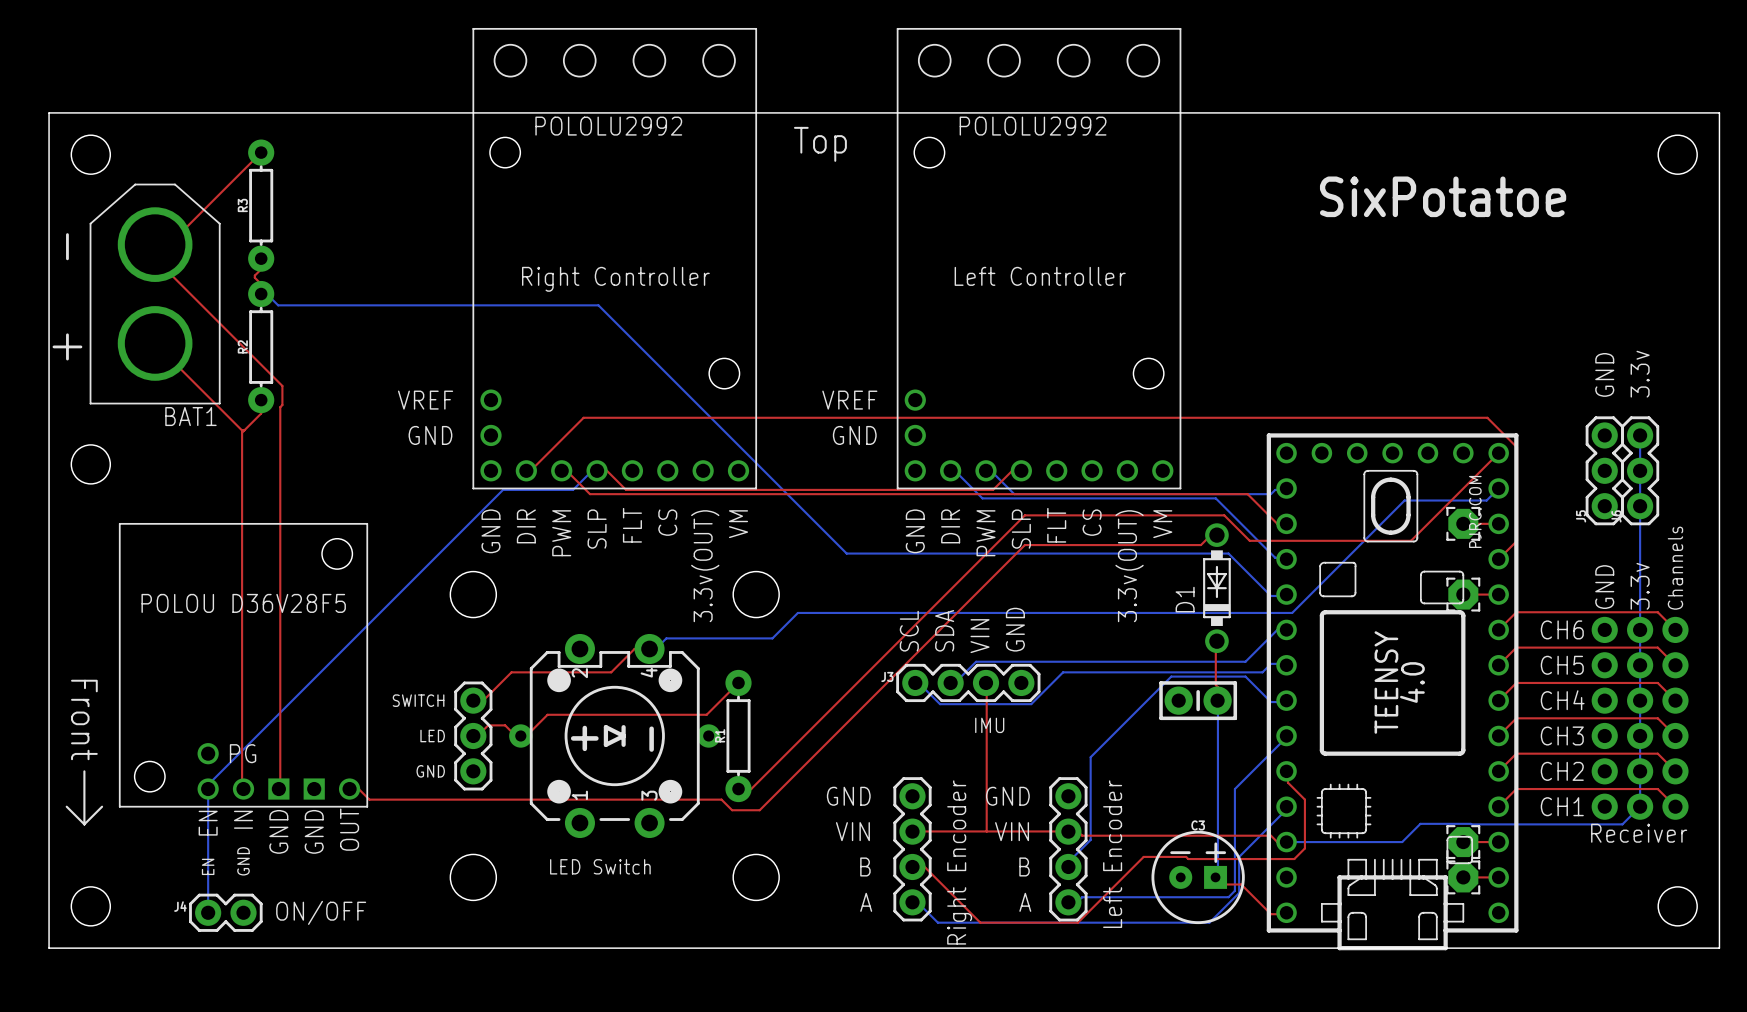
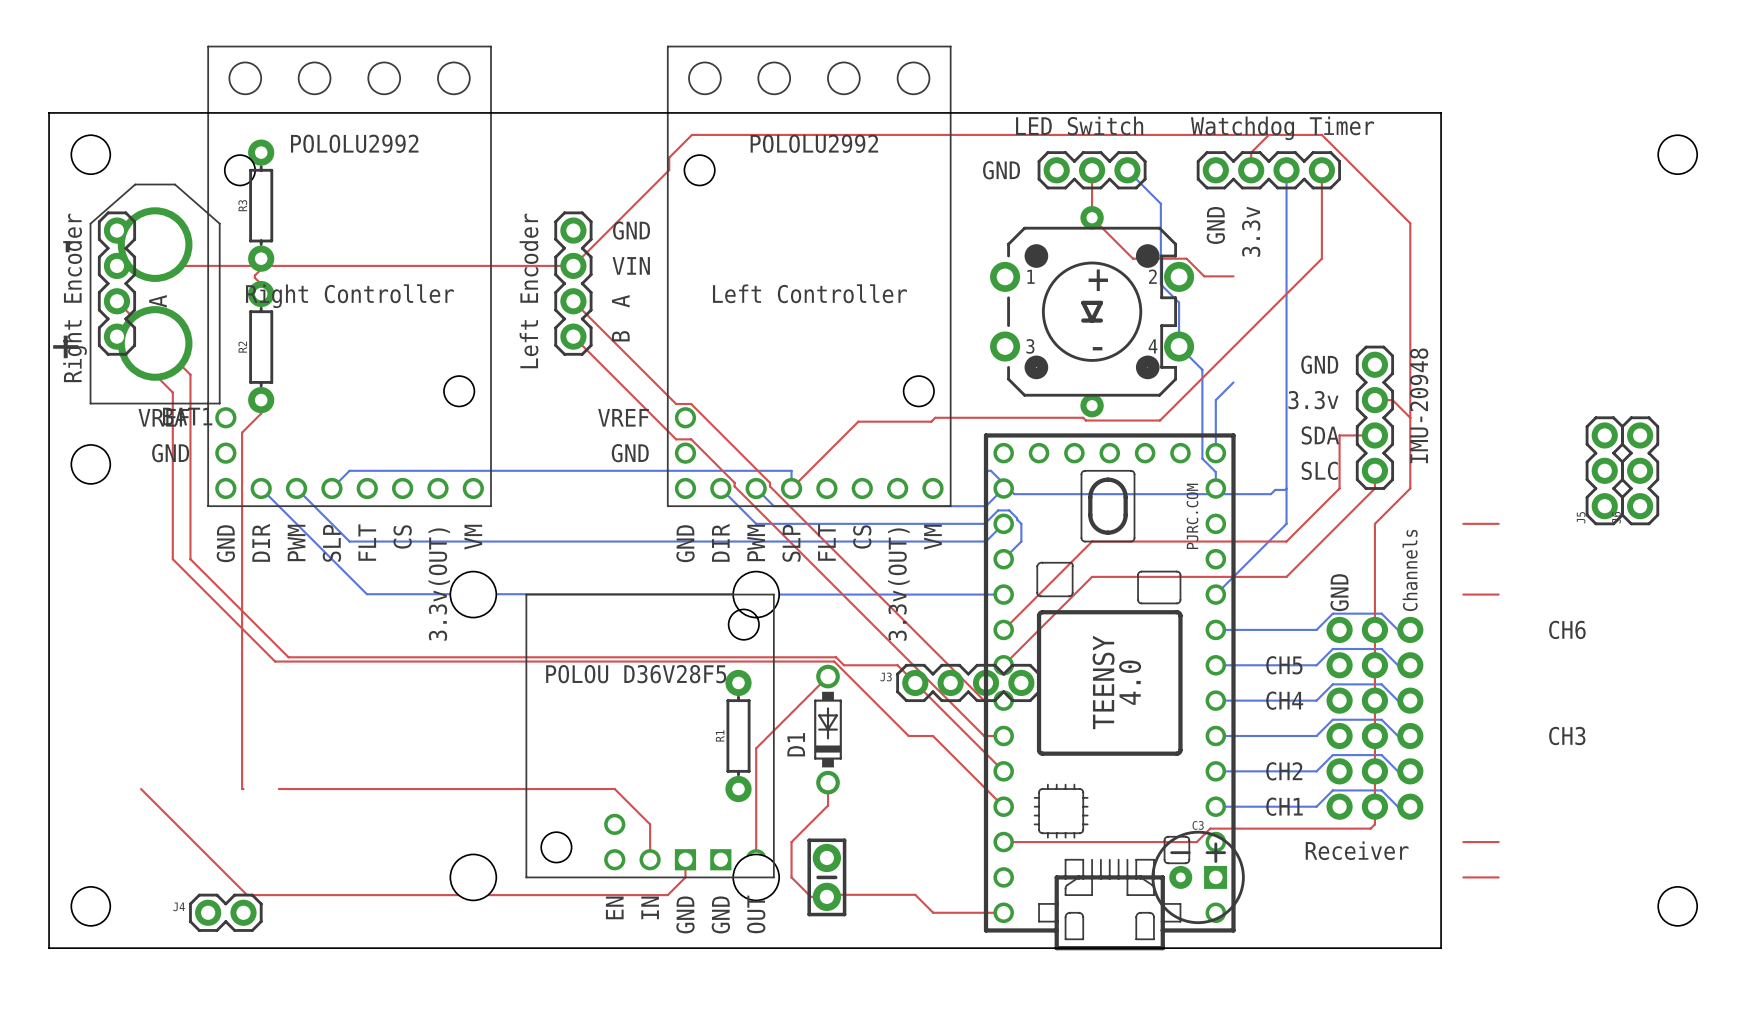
board edge: (1441, 112) (1719, 112) (1719, 948) (1441, 948) -> (1441, 112) (1441, 948)
text: none -> LED Switch (1079, 125)
text: none -> Watchdog Timer (1282, 128)
top track: none -> (1268, 134) (1251, 152) (1251, 170)
text: Top (820, 144) -> none
top track: (261, 152) (169, 243) (155, 243) (155, 258) (282, 385) (282, 405) (280, 407) (280, 789) -> (349, 789) (280, 789)
text: none -> GND (1001, 170)
top track: none -> (1092, 170) (1092, 217) (1133, 258) (1186, 258) (1204, 276) (1233, 276)
part: none -> (1092, 170)
bottom track: none -> (1127, 170) (1160, 203) (1160, 284) (1179, 302) (1179, 346) (1202, 369) (1202, 458) (1215, 472) (1215, 488)
part: none -> (1268, 170)
bottom track: none -> (1286, 170) (1286, 523) (1215, 594)
text: SixPotatoe (1443, 196) -> none
text: none -> GND (631, 230)
text: none -> GND (1215, 225)
text: none -> 3.3v (1251, 231)
part position: (614, 258) -> (349, 276)
part position: (1039, 258) -> (809, 276)
top track: none -> (116, 265) (573, 265) (669, 170) (669, 157) (691, 134) (1321, 134) (1410, 223) (1410, 488) (1374, 523) (1374, 824) (1370, 828) (1210, 828) (1196, 842) (1003, 842)
text: none -> VIN (631, 265)
part: none -> (116, 283)
part: none -> (573, 283)
text: none -> Left Encoder (529, 290)
bottom track: (261, 294) (267, 294) (278, 305) (598, 305) (846, 553) (1228, 553) (1270, 595) (1286, 594) -> none
text: none -> Right Encoder (75, 297)
top track: none -> (116, 301) (190, 374) (190, 559) (288, 657) (835, 657) (843, 665) (897, 665) (1003, 771)
text: none -> A (157, 301)
top track: none -> (573, 301) (676, 403) (691, 403) (769, 482) (769, 486) (984, 700) (1003, 700)
text: none -> A (620, 301)
part: none -> (1092, 311)
top track: none -> (116, 336) (172, 392) (172, 559) (275, 661) (834, 661) (908, 735) (932, 735) (1003, 806)
top track: none -> (573, 336) (676, 439) (691, 439) (734, 482) (734, 486) (984, 735) (1003, 735)
text: none -> B (620, 336)
top track: (155, 343) (244, 430) -> none
text: none -> GND (1319, 364)
text: GND (1604, 374) -> none
text: 3.3v (1640, 374) -> none
bottom track: none -> (1233, 382) (1215, 400) (1215, 453)
text: none -> 3.3v (1313, 400)
top track: none -> (1374, 400) (1392, 400) (1410, 417)
text: none -> IMU-20948 (1419, 405)
top track: (935, 417) (583, 417) (530, 470) (526, 470) -> (935, 417) (931, 421) (858, 421) (791, 488)
top track: (1083, 417) (1487, 417) (1517, 447) (1517, 540) (1498, 559) -> (1083, 417) (1085, 420) (1160, 420) (1321, 258) (1321, 170)
part: none -> (1374, 417)
text: none -> SDA (1320, 435)
top track: none -> (1374, 435) (1339, 435) (1339, 488) (1286, 541) (1092, 541) (1003, 629)
bottom track: (1640, 435) (1640, 806) (1622, 824) (1420, 823) (1402, 842) (1286, 842) -> none
top track: (1498, 453) (1410, 540) (1249, 540) (1224, 515) (1024, 515) (751, 789) (738, 789) -> none
top track: (561, 470) (566, 470) (590, 494) (1247, 494) (1277, 523) (1286, 523) -> none
bottom track: (592, 470) (573, 489) (503, 489) (208, 784) (208, 912) -> (592, 470) (349, 470) (331, 488)
top track: (597, 470) (606, 470) (626, 489) (993, 489) (1012, 470) (1021, 470) -> none
bottom track: none -> (597, 470) (791, 470) (791, 488)
bottom track: (950, 470) (954, 470) (982, 498) (1215, 498) (1275, 557) (1286, 559) -> none
text: none -> SLC (1319, 470)
top track: none -> (1374, 470) (1374, 488) (1286, 576) (1092, 576) (1003, 665)
bottom track: none -> (261, 488) (366, 594) (1003, 594)
bottom track: none -> (296, 488) (349, 541) (986, 541) (1003, 523)
bottom track: none -> (720, 488) (756, 523) (984, 523) (998, 510) (1009, 510) (1021, 523) (1021, 541) (1003, 559)
bottom track: none -> (756, 488) (773, 506) (986, 506) (1003, 488)
bottom track: (1498, 488) (1486, 500) (1404, 500) (1292, 612) (797, 612) (772, 638) (666, 638) (657, 646) (651, 646) (649, 648) -> none
part: (1463, 523) -> none
top track: (1216, 535) (1209, 536) (1200, 545) (1024, 545) (759, 810) (732, 810) (721, 799) (369, 799) (358, 789) -> (650, 859) (650, 824) (614, 789) (358, 789)
text position: Channels (1675, 568) -> Channels (1410, 570)
text: 3.3v (1640, 586) -> none
text: none -> GND (1339, 592)
text: GND (1604, 587) -> none
D1 position: (1216, 588) -> (828, 729)
part: (1463, 594) -> none
text: GND (1015, 629) -> none
bottom track: (1277, 629) (1245, 661) (976, 661) (954, 682) (950, 682) -> (1277, 629) (1215, 629)
bottom track: none -> (1286, 629) (1316, 629) (1332, 613) (1381, 613) (1397, 629) (1410, 629)
top track: (1498, 629) (1516, 612) (1657, 612) (1675, 629) -> none
text: SDA (944, 630) -> none
text: SCL (909, 631) -> none
text: VIN (980, 636) -> none
top track: (1216, 641) (1215, 685) (1217, 687) (1217, 700) -> none
top track: (649, 649) (634, 649) (611, 672) (511, 672) (483, 699) (473, 700) -> none
part: (243, 665) -> none
bottom track: none -> (1215, 665) (1316, 665) (1332, 649) (1381, 649) (1397, 665) (1410, 665)
bottom track: (1286, 665) (1270, 663) (1262, 672) (1063, 672) (1031, 704) (940, 704) (918, 682) (915, 682) -> none
top track: (1498, 665) (1516, 647) (1657, 647) (1675, 665) -> none
text position: CH5 (1562, 665) -> CH5 (1284, 665)
top track: none -> (828, 676) (756, 748) (756, 859)
top track: (738, 682) (706, 714) (547, 714) (526, 735) (515, 735) (505, 725) (488, 725) (477, 735) (473, 735) -> none
top track: (986, 682) (986, 831) -> none
part position: (1392, 691) -> (1109, 691)
text: SWITCH (418, 700) -> none
part: (1198, 700) -> none
bottom track: none -> (1215, 700) (1316, 700) (1332, 684) (1381, 684) (1397, 700) (1410, 700)
bottom track: (1217, 700) (1217, 873) (1215, 877) -> none
bottom track: (1286, 700) (1270, 702) (1245, 676) (1171, 676) (1090, 757) (1090, 839) (1069, 861) (1068, 866) -> none
top track: (1498, 700) (1516, 682) (1657, 682) (1675, 700) -> none
text position: CH4 (1562, 700) -> CH4 (1284, 700)
part: none -> (1339, 718)
part: none -> (1374, 718)
part: none -> (1410, 718)
part: (1604, 718) -> none
part: (1640, 718) -> none
part: (1675, 718) -> none
text: Front (84, 719) -> none
text: IMU (989, 725) -> none
text: LED (432, 735) -> none
part: (473, 735) -> none
part: (614, 735) -> none
part: none -> (650, 735)
bottom track: (1285, 735) (1234, 789) (1234, 890) (1228, 897) (1082, 897) (1077, 901) (1068, 902) -> (1285, 735) (1215, 735)
bottom track: none -> (1286, 735) (1316, 735) (1332, 719) (1381, 719) (1397, 735) (1410, 735)
top track: (1498, 735) (1516, 718) (1657, 718) (1675, 735) -> none
text: PG (243, 753) -> none
line: (84, 771) (84, 824) -> none
text: GND (430, 771) -> none
bottom track: none -> (1215, 771) (1316, 771) (1332, 755) (1381, 755) (1397, 771) (1410, 771)
top track: (1286, 771) (1287, 782) (1304, 799) (1304, 848) (1294, 859) (1143, 856) (1077, 922) (980, 922) (925, 867) (912, 866) -> none
top track: (1498, 771) (1516, 753) (1657, 753) (1675, 771) -> none
text position: CH2 (1562, 771) -> CH2 (1284, 771)
top track: none -> (828, 782) (828, 805) (791, 842) (791, 877) (810, 896) (826, 896) (828, 894) (915, 894) (933, 912) (1003, 912)
top track: none -> (141, 789) (247, 895) (667, 895) (685, 877) (685, 859)
text: GND (848, 796) -> none
text: GND (1007, 796) -> none
line: (66, 806) (84, 824) -> none
line: (102, 806) (84, 824) -> none
bottom track: none -> (1215, 806) (1316, 806) (1332, 790) (1381, 790) (1397, 806) (1410, 806)
bottom track: (1286, 806) (1281, 814) (1239, 856) (1239, 892) (1209, 922) (937, 922) (918, 903) (912, 902) -> none
top track: (1498, 806) (1516, 789) (1657, 789) (1675, 806) -> none
text position: CH1 (1562, 806) -> CH1 (1284, 806)
text: IN (243, 819) -> none
text: EN (208, 823) -> none
text: OUT (349, 829) -> none
text: GND (278, 831) -> none
text: GND (314, 831) -> none
text: VIN (852, 831) -> none
top track: (912, 831) (1067, 831) (1082, 835) (1270, 835) (1277, 842) (1286, 842) -> none
text: VIN (1012, 831) -> none
text position: Receiver (1639, 833) -> Receiver (1357, 850)
part: (1463, 842) -> none
part: (912, 849) -> none
part: (1068, 849) -> none
text: Left Encoder (1112, 854) -> none
text: GND (243, 861) -> none
text: Right Encoder (959, 862) -> none
text: EN (208, 866) -> none
text: LED Switch (600, 866) -> none
text: B (865, 866) -> none
text: B (1024, 866) -> none
part: none -> (826, 877)
top track: (1215, 877) (1222, 884) (1241, 884) (1270, 914) (1286, 912) -> none
part: (1463, 877) -> none
text: A (866, 902) -> none
text: A (1025, 902) -> none
text: none -> IN (650, 907)
text: none -> EN (614, 907)
text: ON/OFF (321, 912) -> none
text: none -> OUT (756, 914)
text: none -> GND (685, 914)
text: none -> GND (720, 914)

